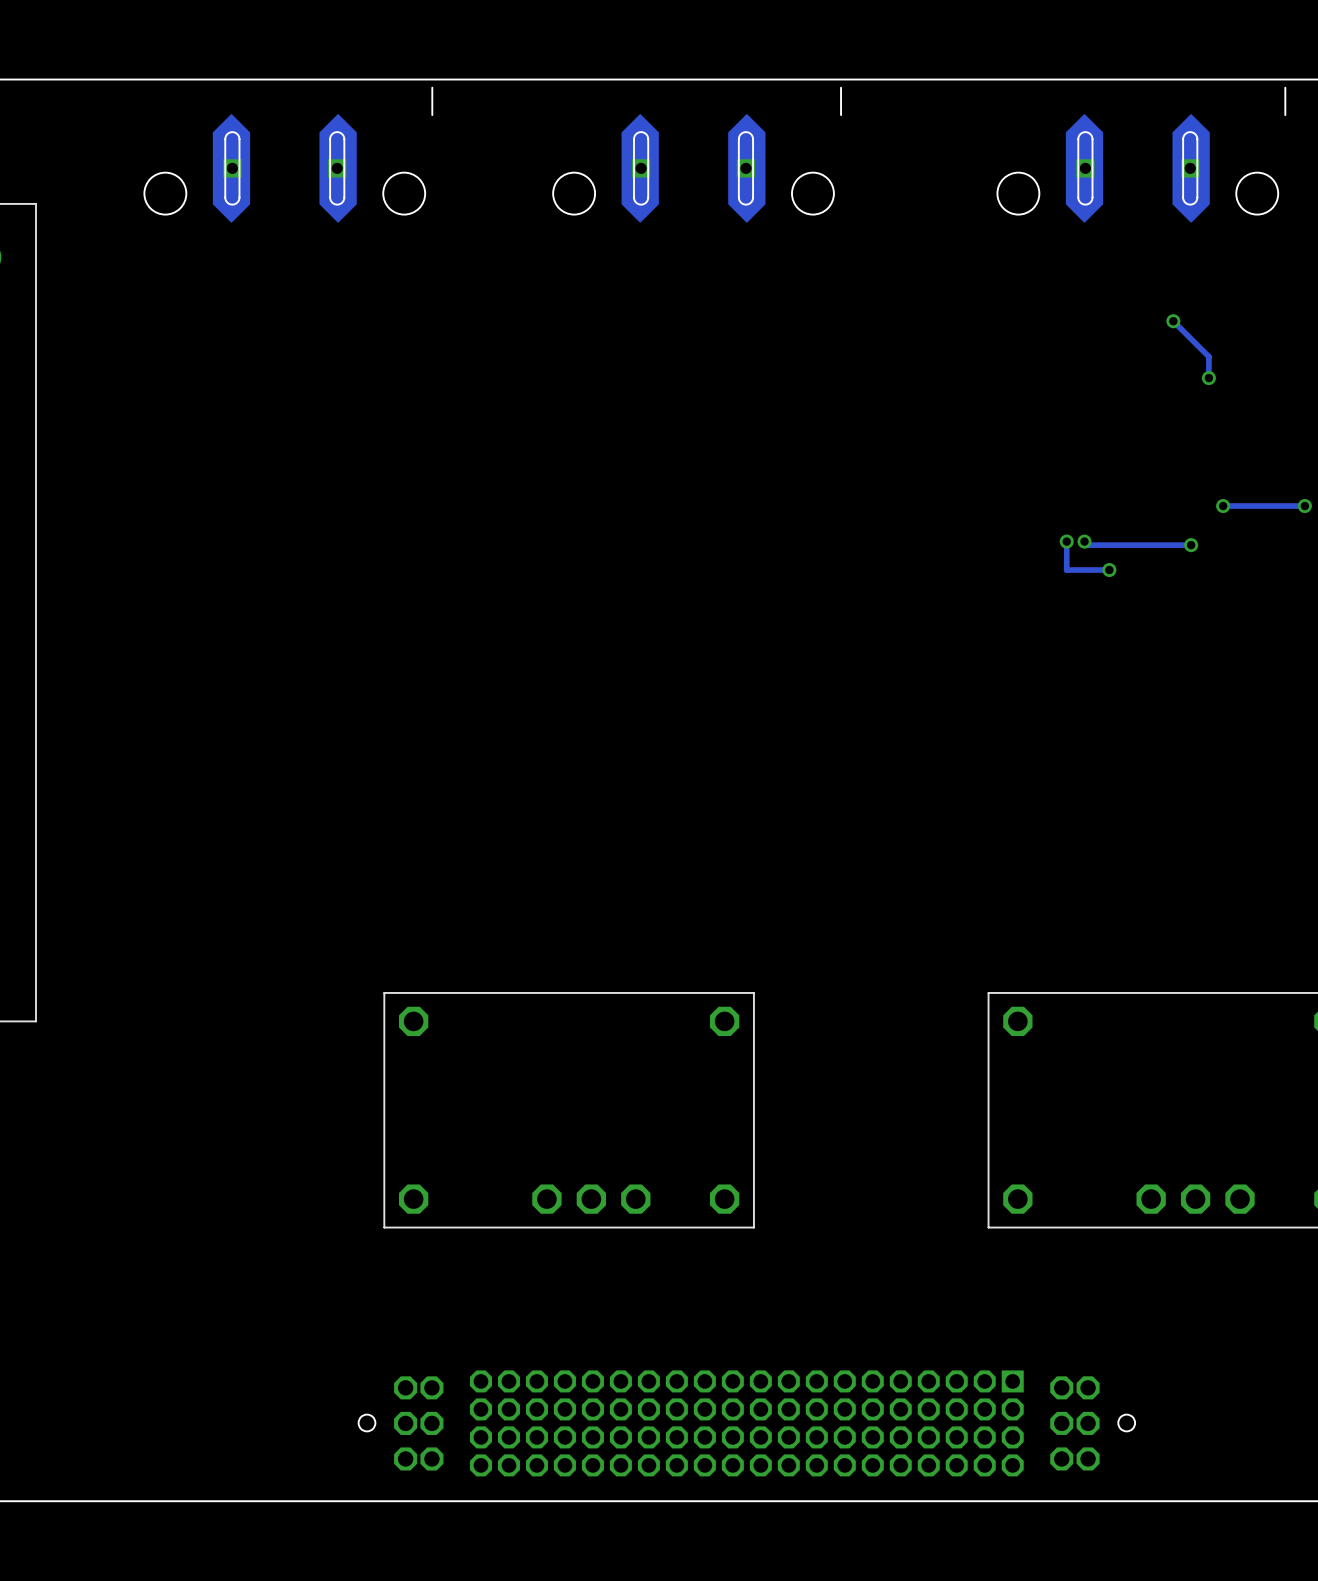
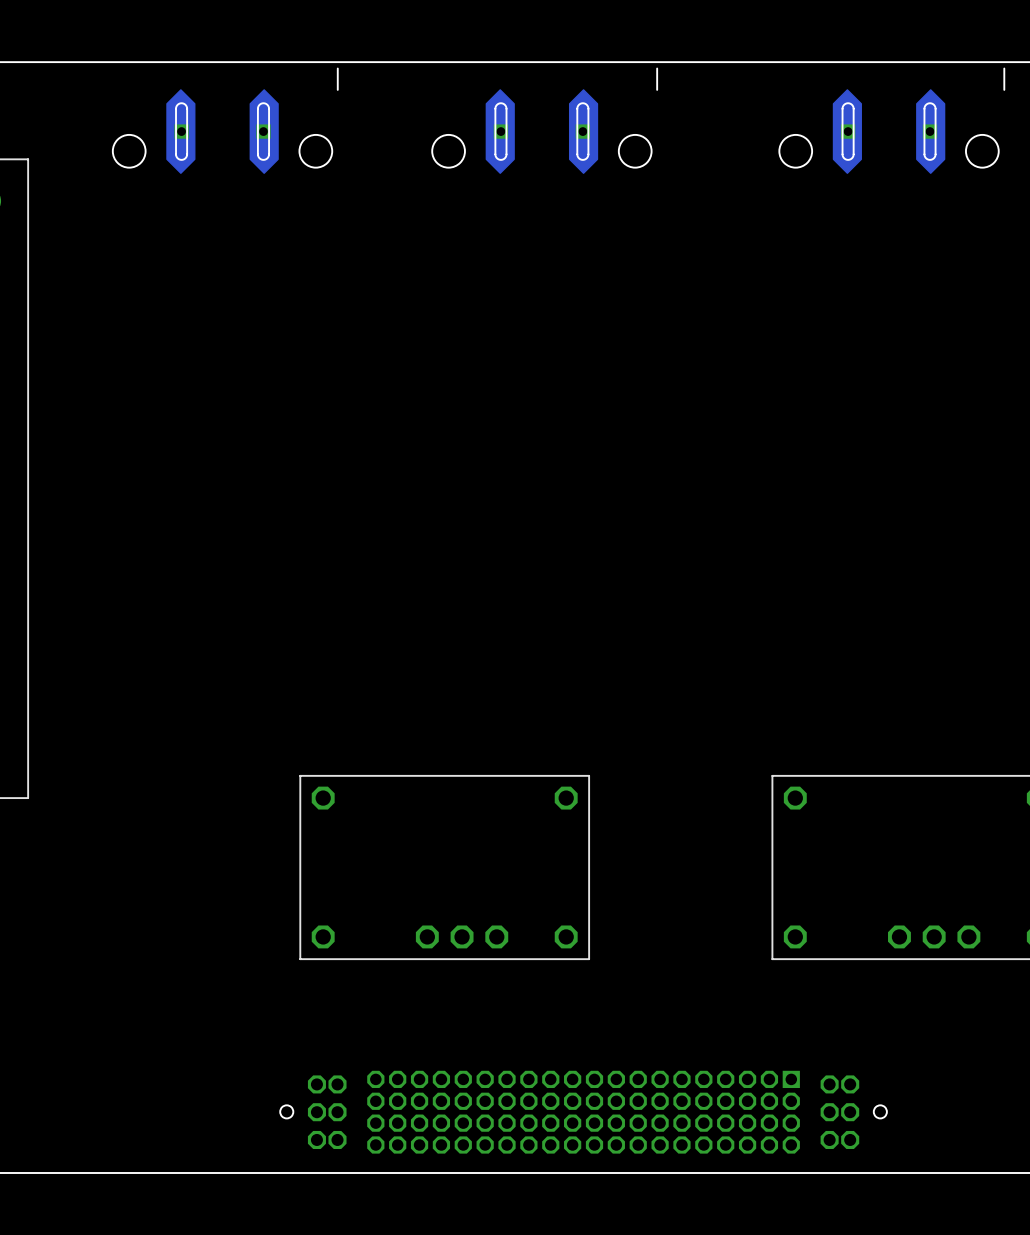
track: (1173, 321) (1208, 356) (1208, 378) -> none
via: (1173, 321) -> none
via: (1208, 378) -> none
via: (1223, 506) -> none
track: (1304, 506) (1223, 506) -> none
via: (1304, 506) -> none
track: (1066, 541) (1066, 570) (1109, 570) -> none
via: (1066, 541) -> none
track: (1084, 541) (1084, 545) (1191, 545) -> none
via: (1084, 541) -> none
via: (1191, 545) -> none
via: (1109, 570) -> none

